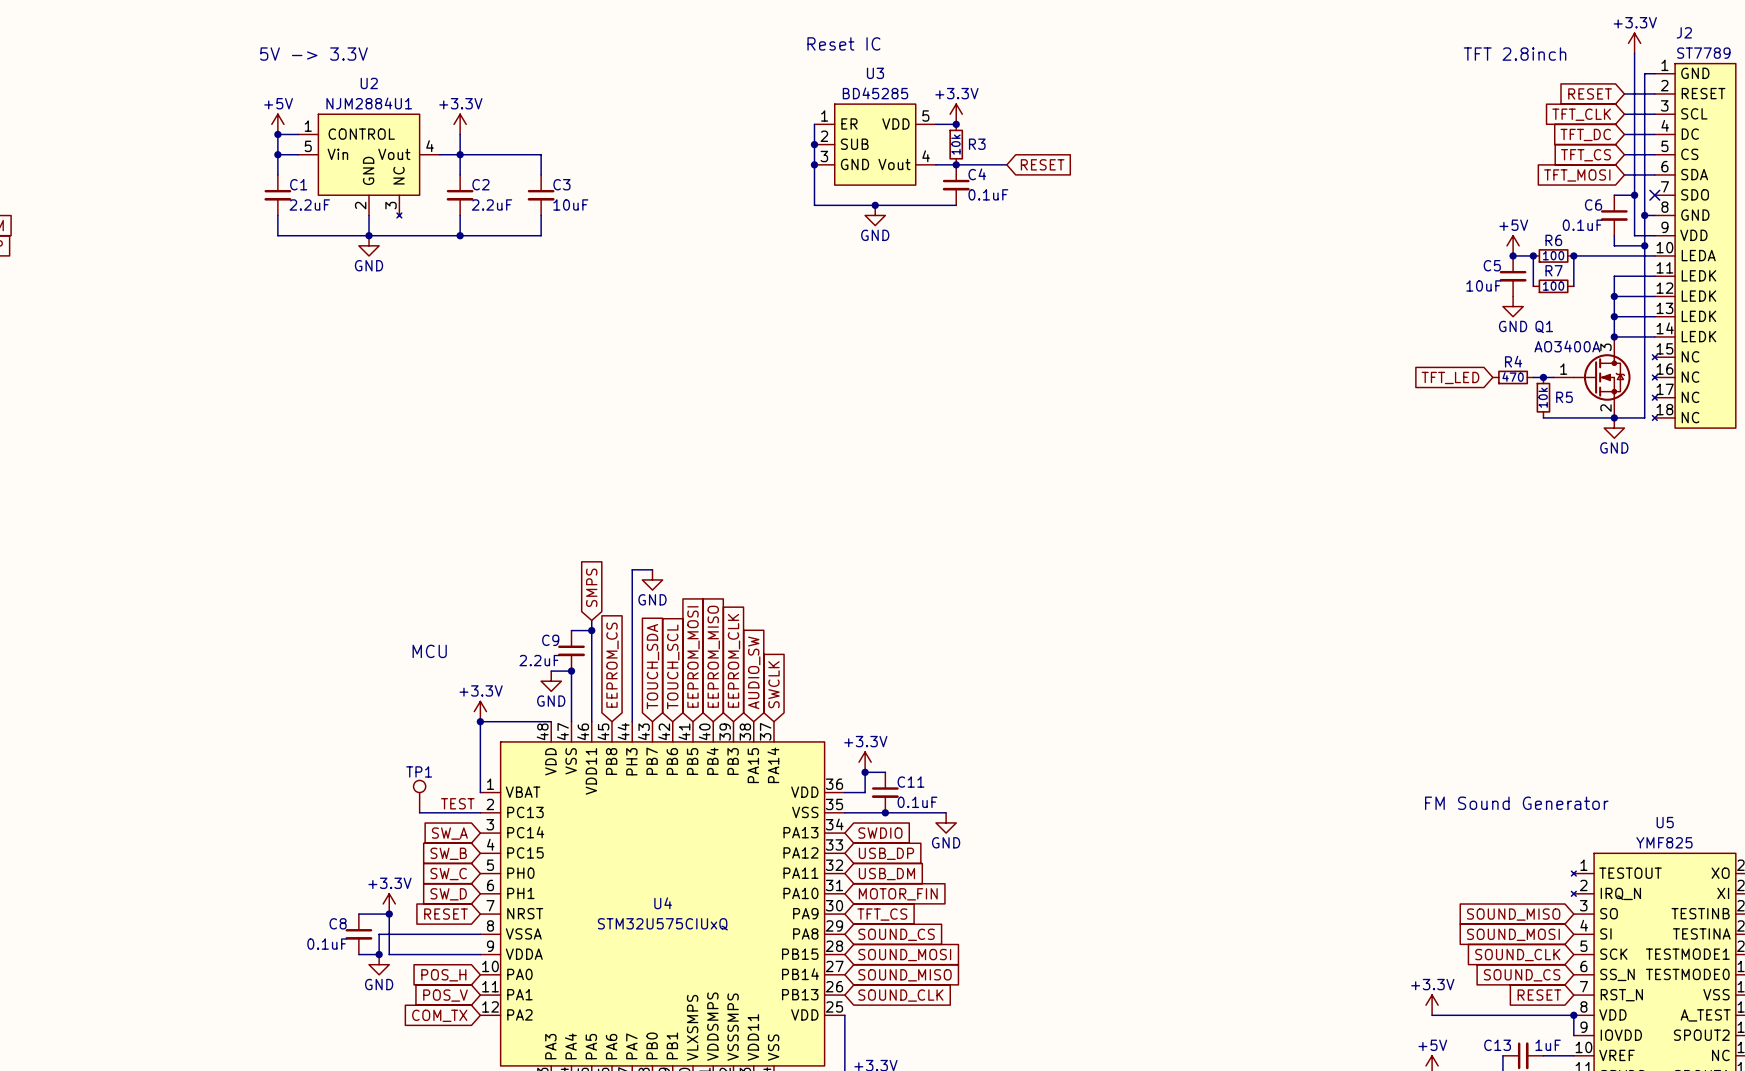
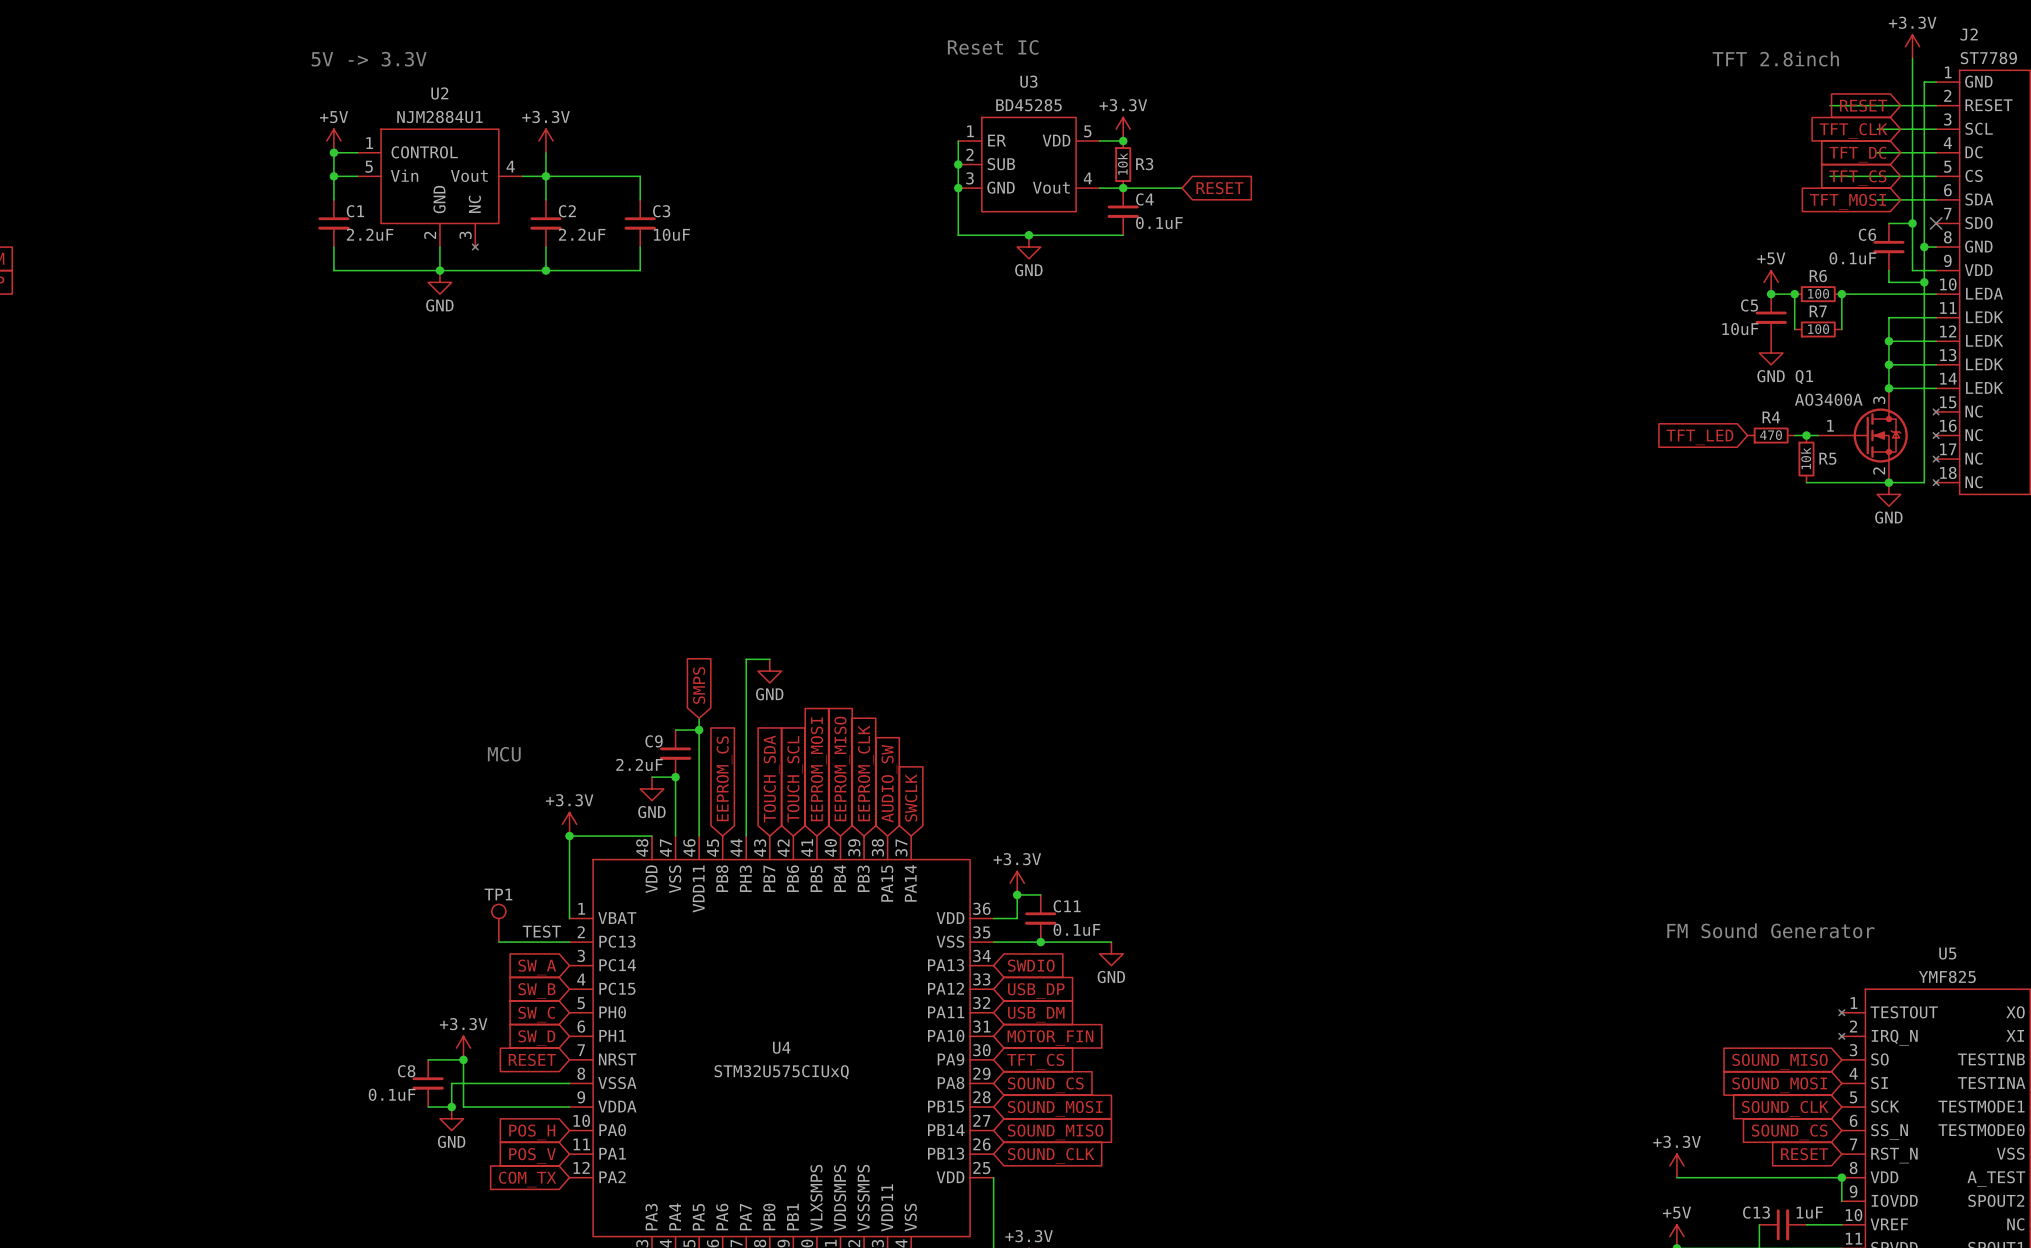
wire: none -> (1830, 105) (1900, 105)
wire: none -> (1877, 129) (1900, 129)
wire: none -> (1877, 152) (1900, 152)
wire: none -> (1830, 176) (1900, 176)
wire: none -> (1877, 199) (1900, 199)

